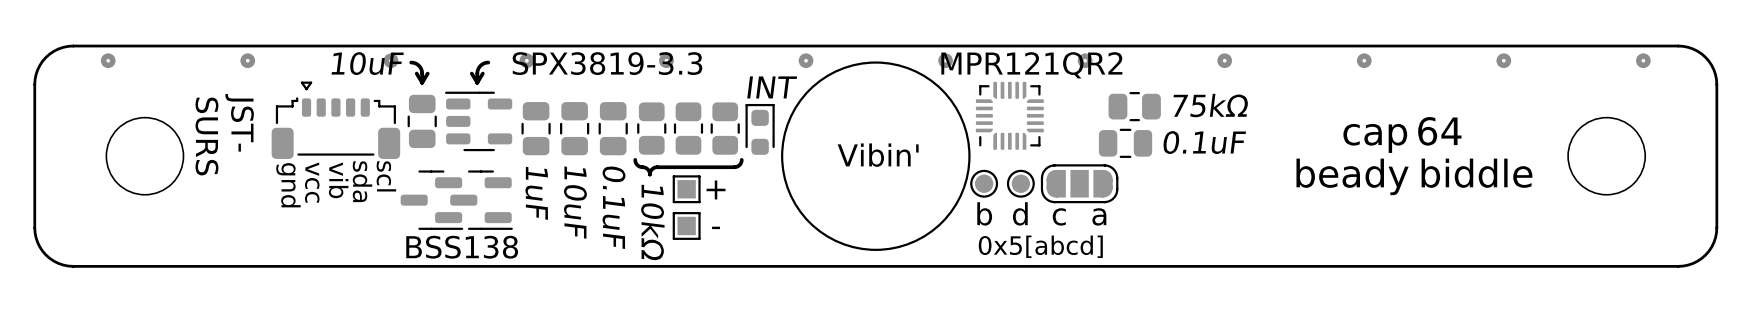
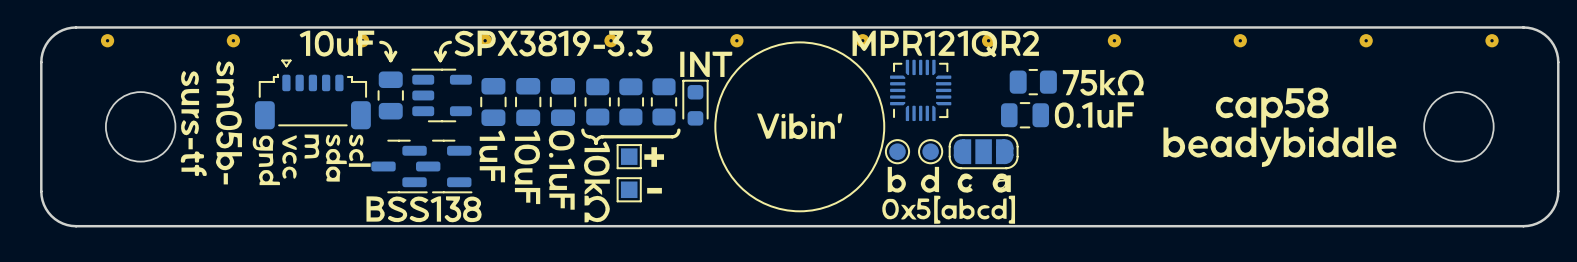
drawing: none -> [180, 30, 1397, 224]
part value: 10uF (367, 63) -> none
part value: SPX3819-3.3 (607, 63) -> none
part value: MPR121QR2 (1031, 65) -> none
part value: INT (772, 87) -> none
part value: 75kΩ (1210, 105) -> none
text: JST- (239, 122) -> none
text: 64 (1439, 131) -> none
text: SURS (206, 136) -> none
text: cap (1375, 138) -> none
part value: 0.1uF (1204, 142) -> none
text: Vibin' (878, 155) -> none
text: biddle (1476, 173) -> none
text: scl (386, 176) -> none
text: beady (1352, 176) -> none
text: vib (338, 180) -> none
text: sda (362, 181) -> none
text: vcc (312, 182) -> none
text: gnd (288, 185) -> none
part value: + (716, 189) -> none
part value: 1uF (536, 193) -> none
part value: 10uF (575, 202) -> none
part value: 0.1uF (614, 207) -> none
part value: b (984, 213) -> none
part value: d (1020, 213) -> none
part value: 10kΩ (652, 222) -> none
part value: - (716, 227) -> none
text: 0x5[abcd] (1040, 246) -> none
part value: BSS138 (462, 247) -> none

